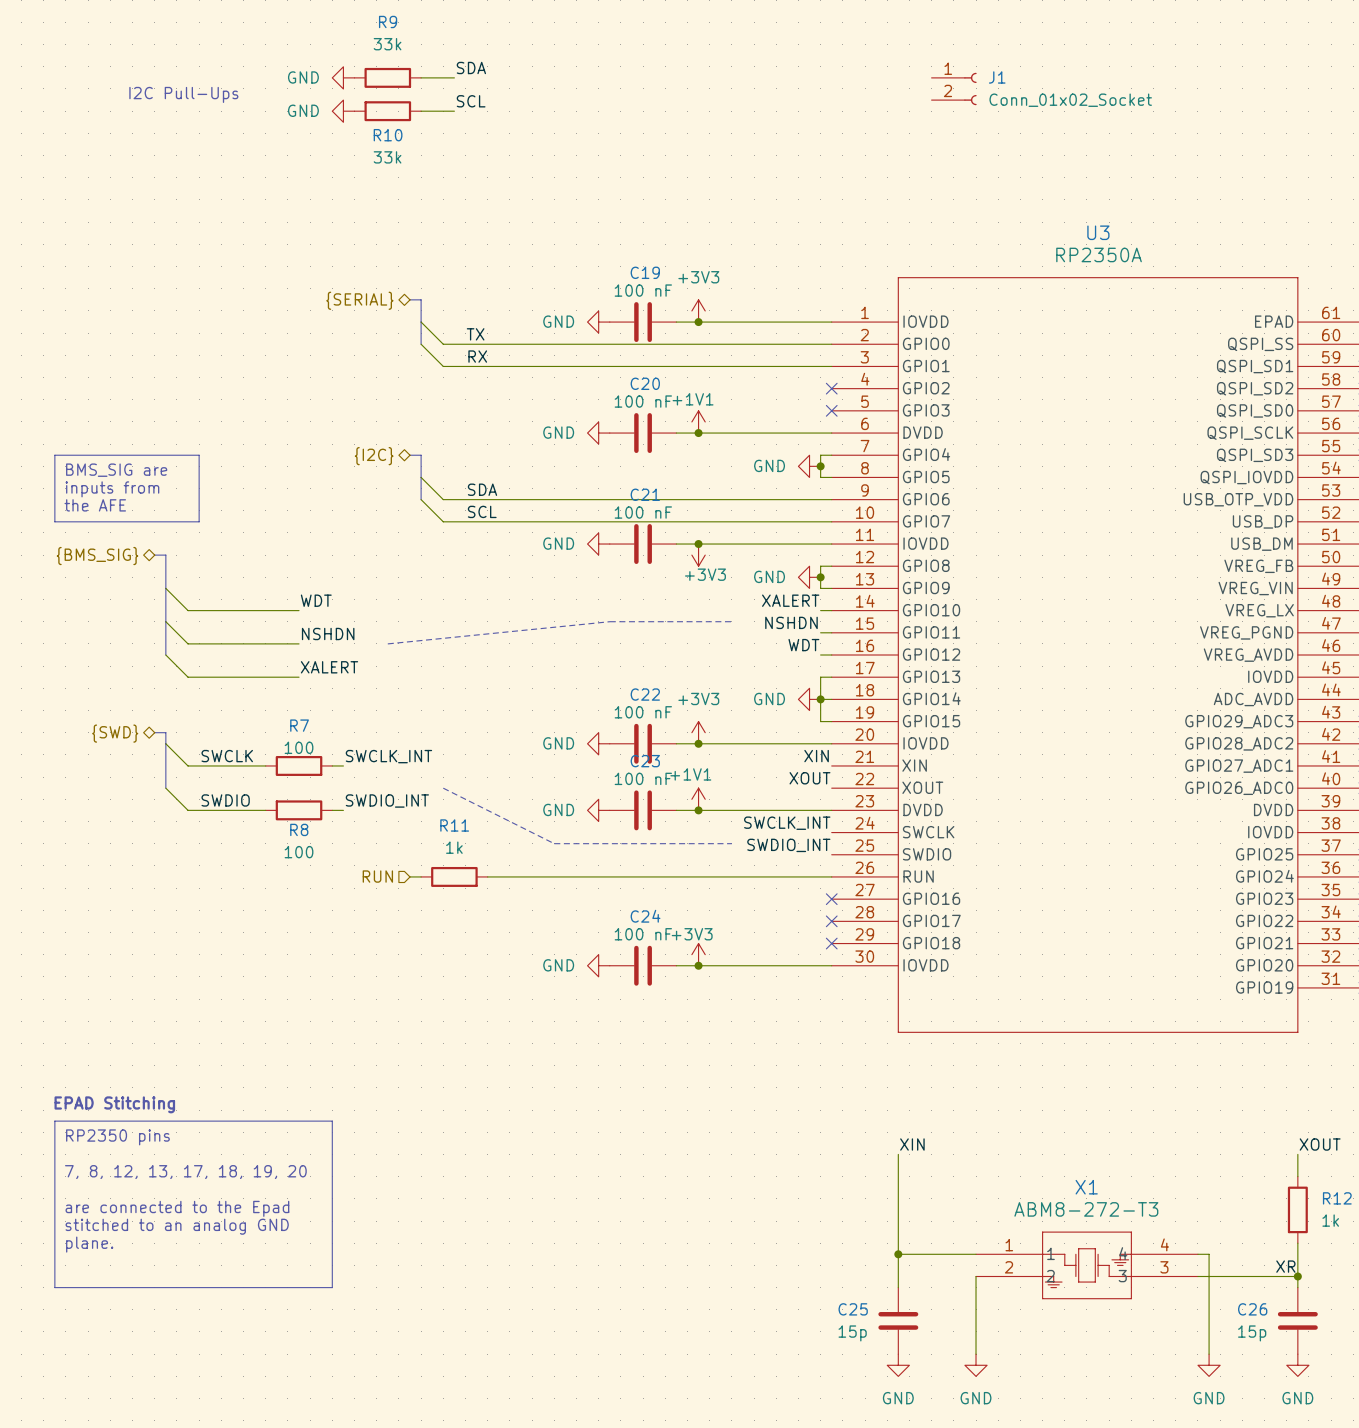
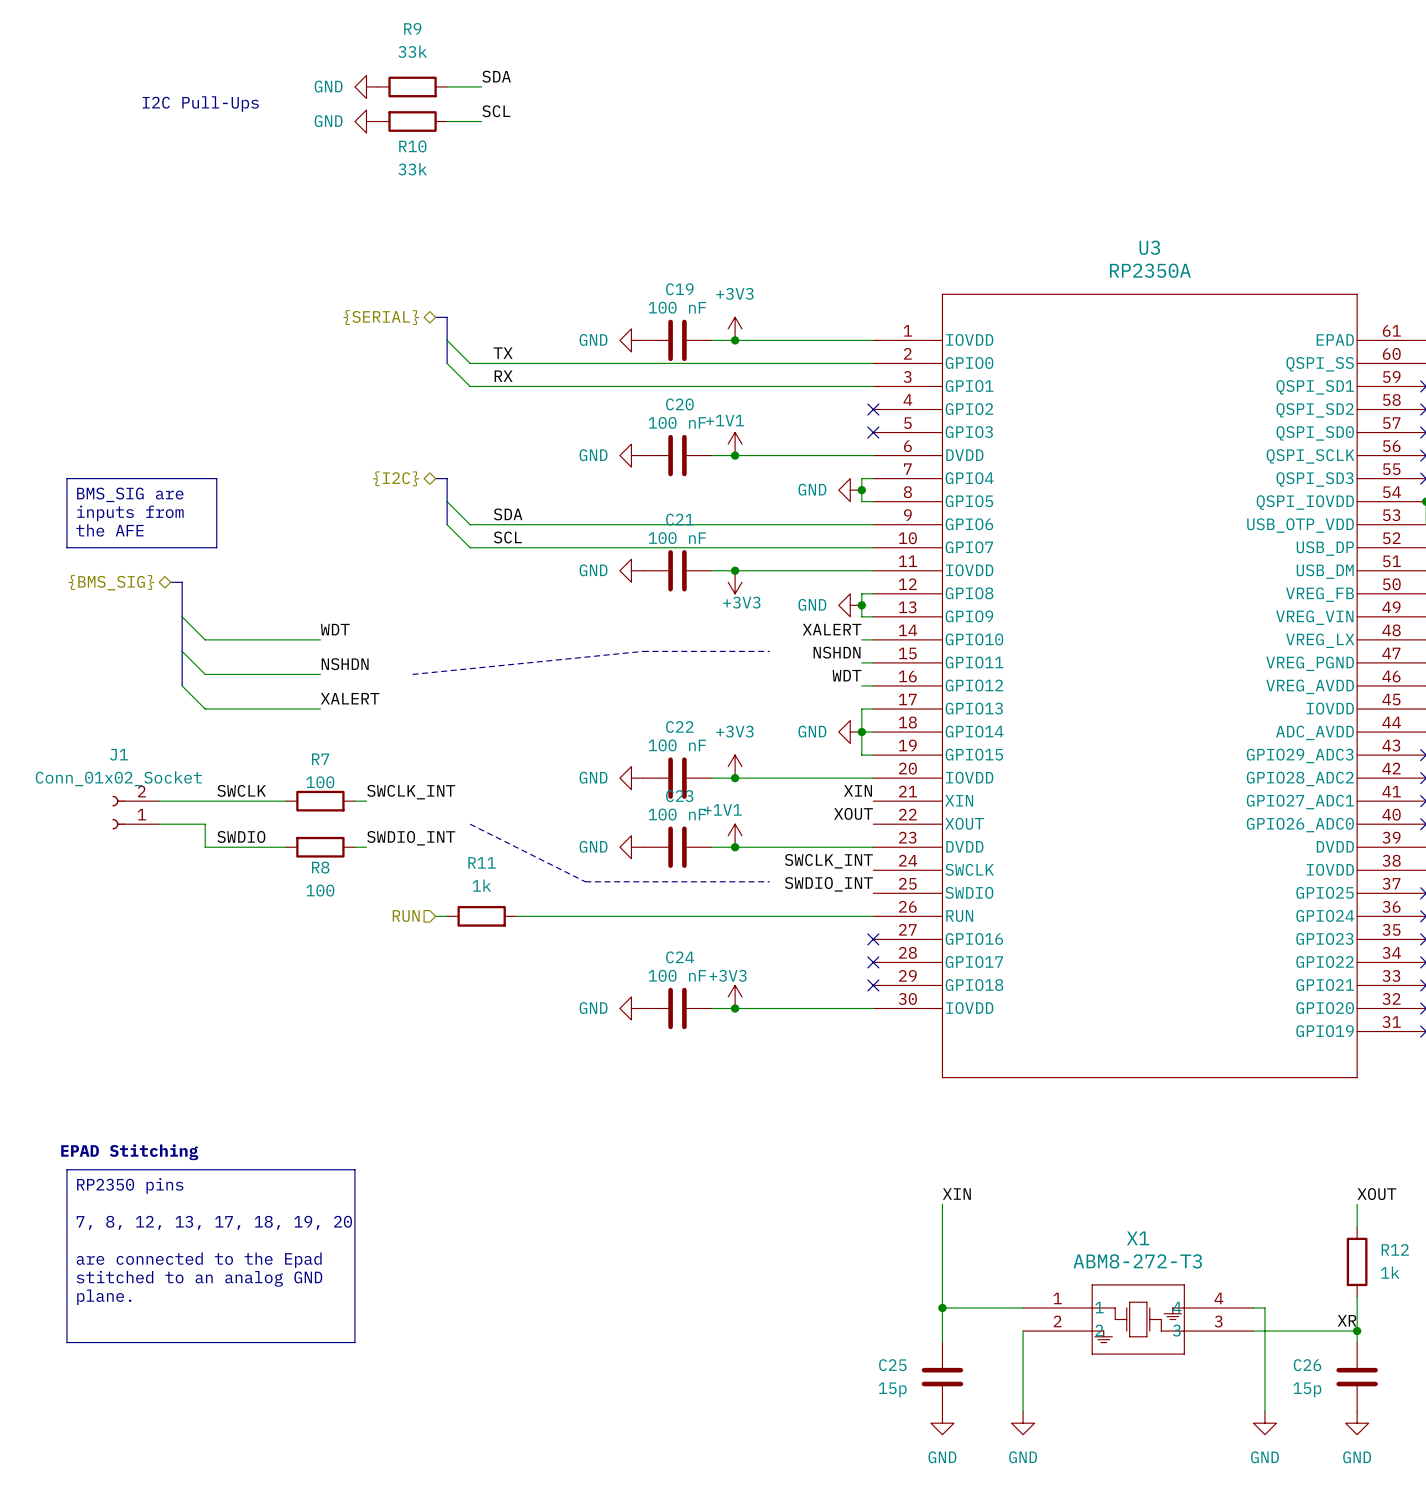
J1 name position: J1 (997, 77) -> J1 (119, 754)
J1 position: (954, 88) -> (135, 812)
J1 rotation: 0° (970, 88) -> 180° (118, 812)
J1 value position: Conn_01x02_Socket (1070, 100) -> Conn_01x02_Socket (118, 778)
bus: (154, 732) (165, 732) (165, 788) -> none
hierarchical label: {SWD} (115, 733) -> none
wire: (165, 743) (188, 765) -> (159, 801) (205, 801)
wire: (165, 788) (188, 810) -> (159, 824) (205, 824) (205, 847)

